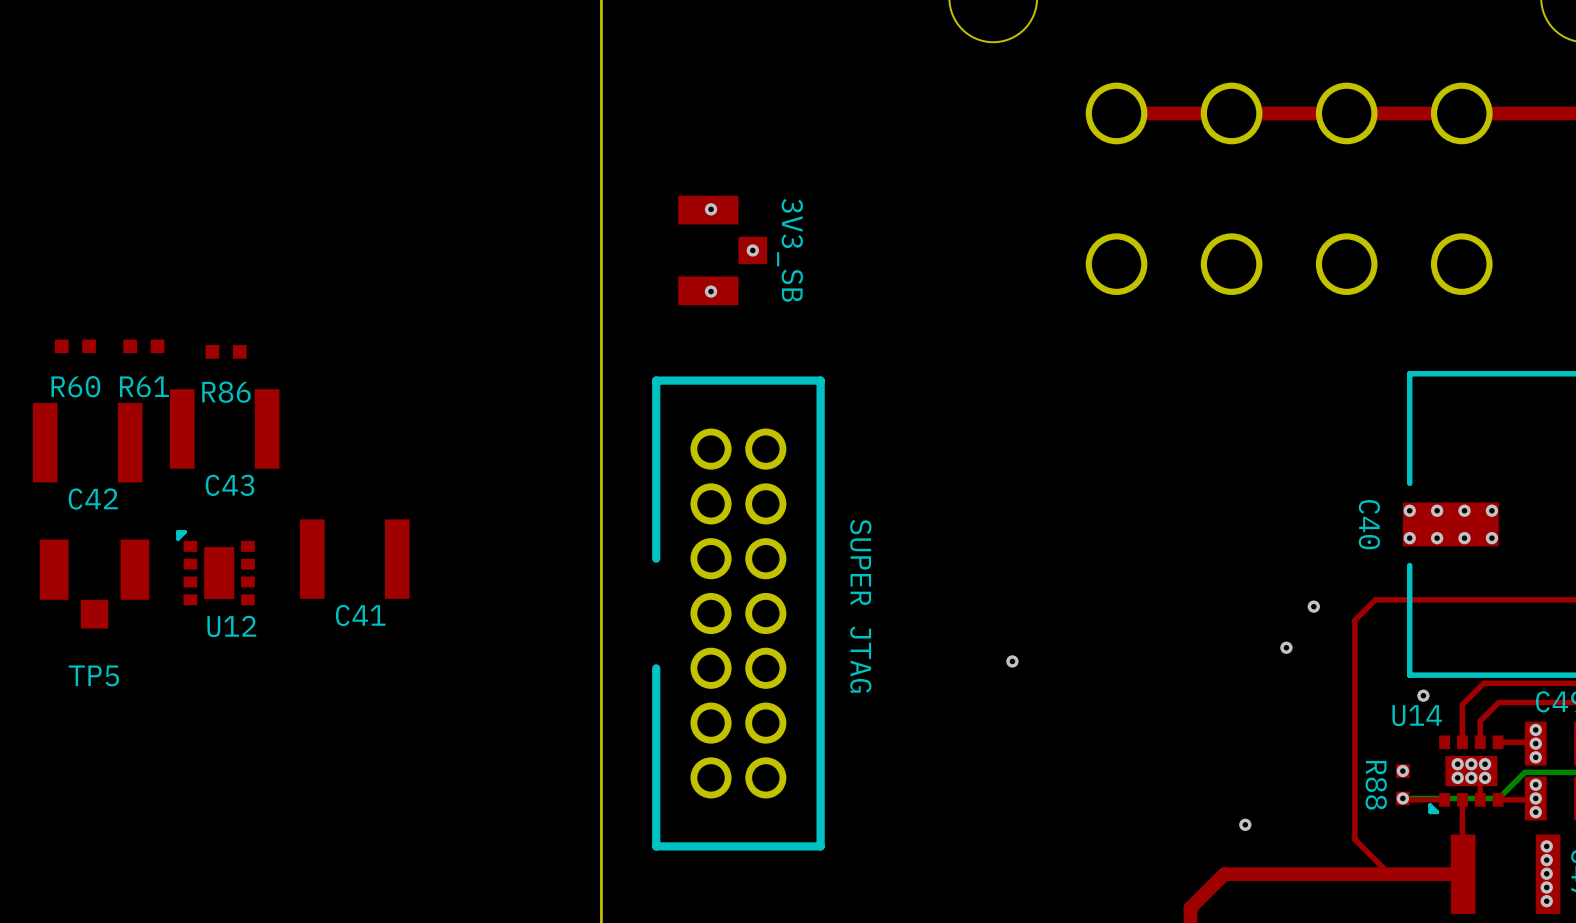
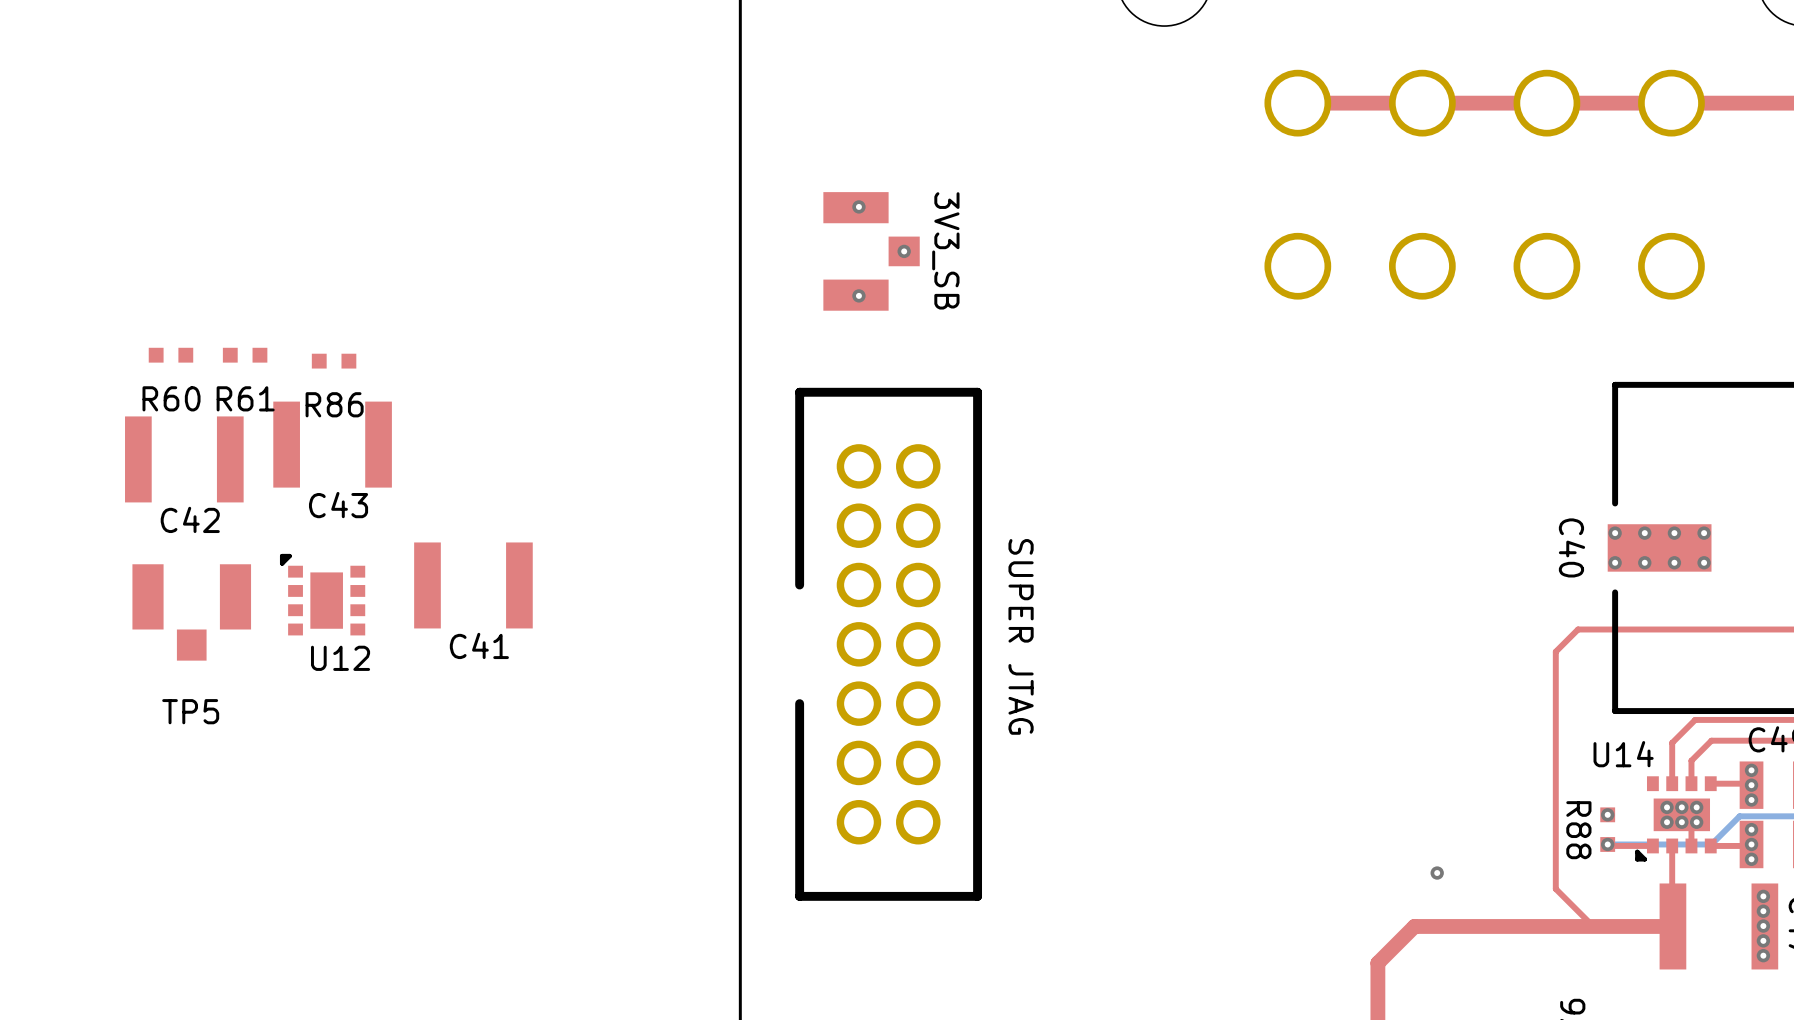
via: (1313, 606) -> none
via: (1286, 647) -> none
via: (1012, 661) -> none
via: (1423, 695) -> none

